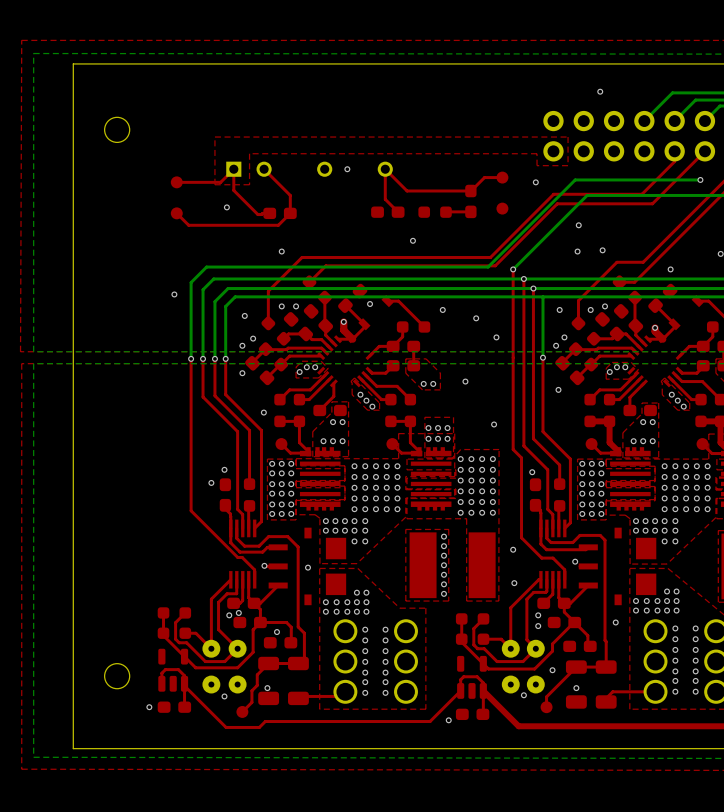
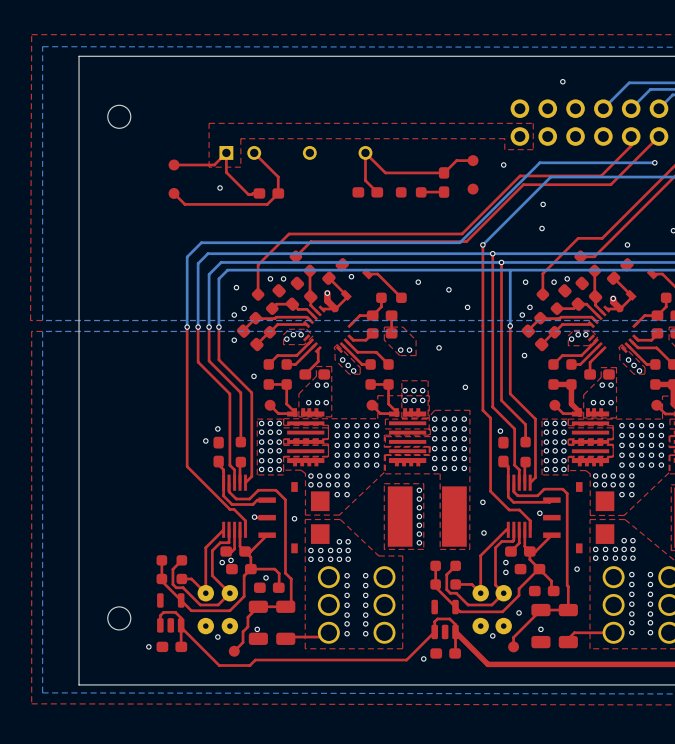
via: (347, 169) -> none
via: (412, 240) -> none
via: (602, 250) -> none
via: (281, 251) -> none
via: (174, 294) -> none

